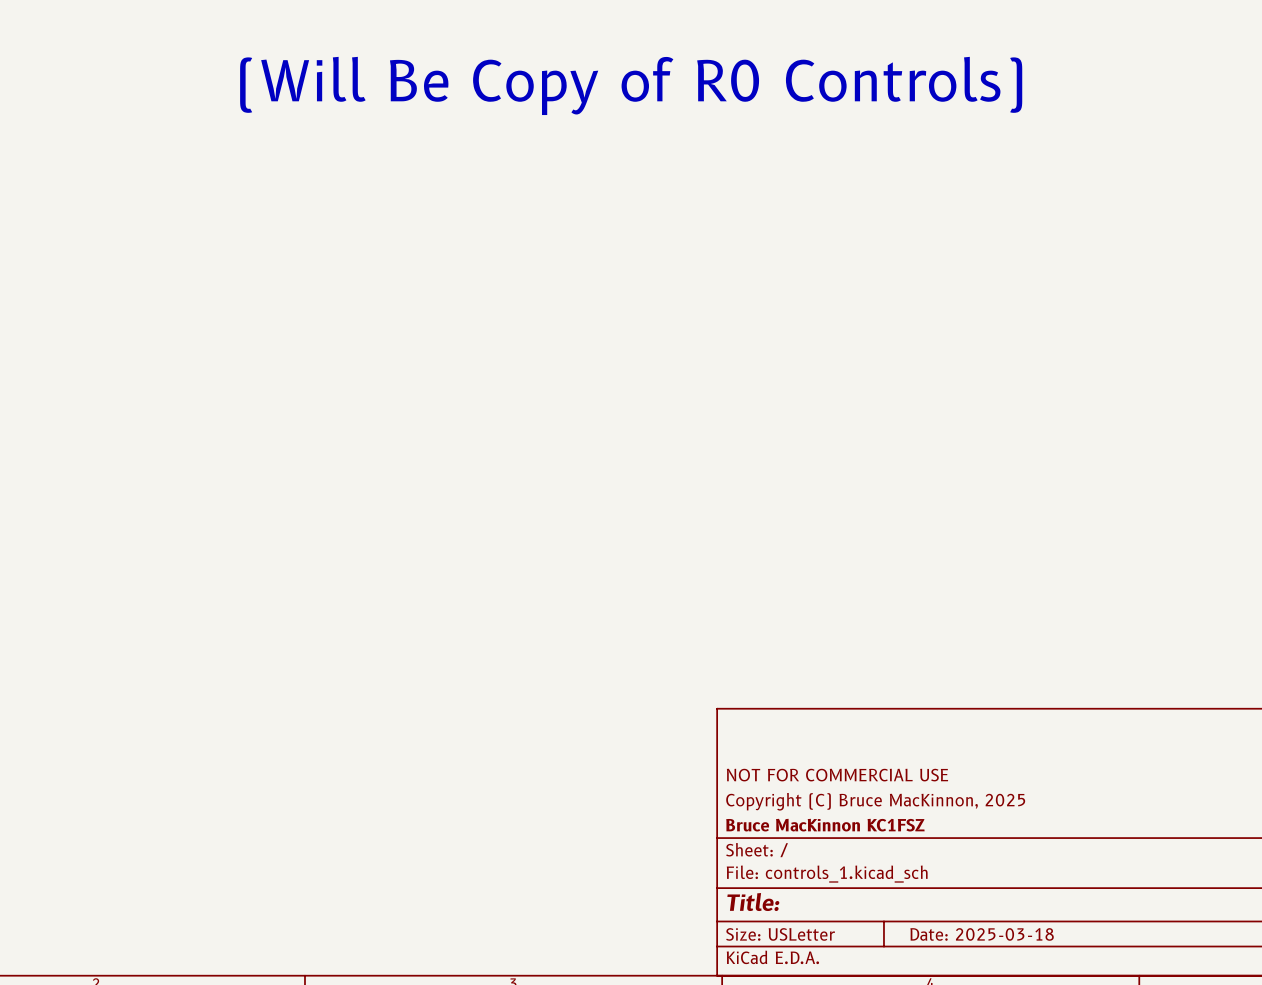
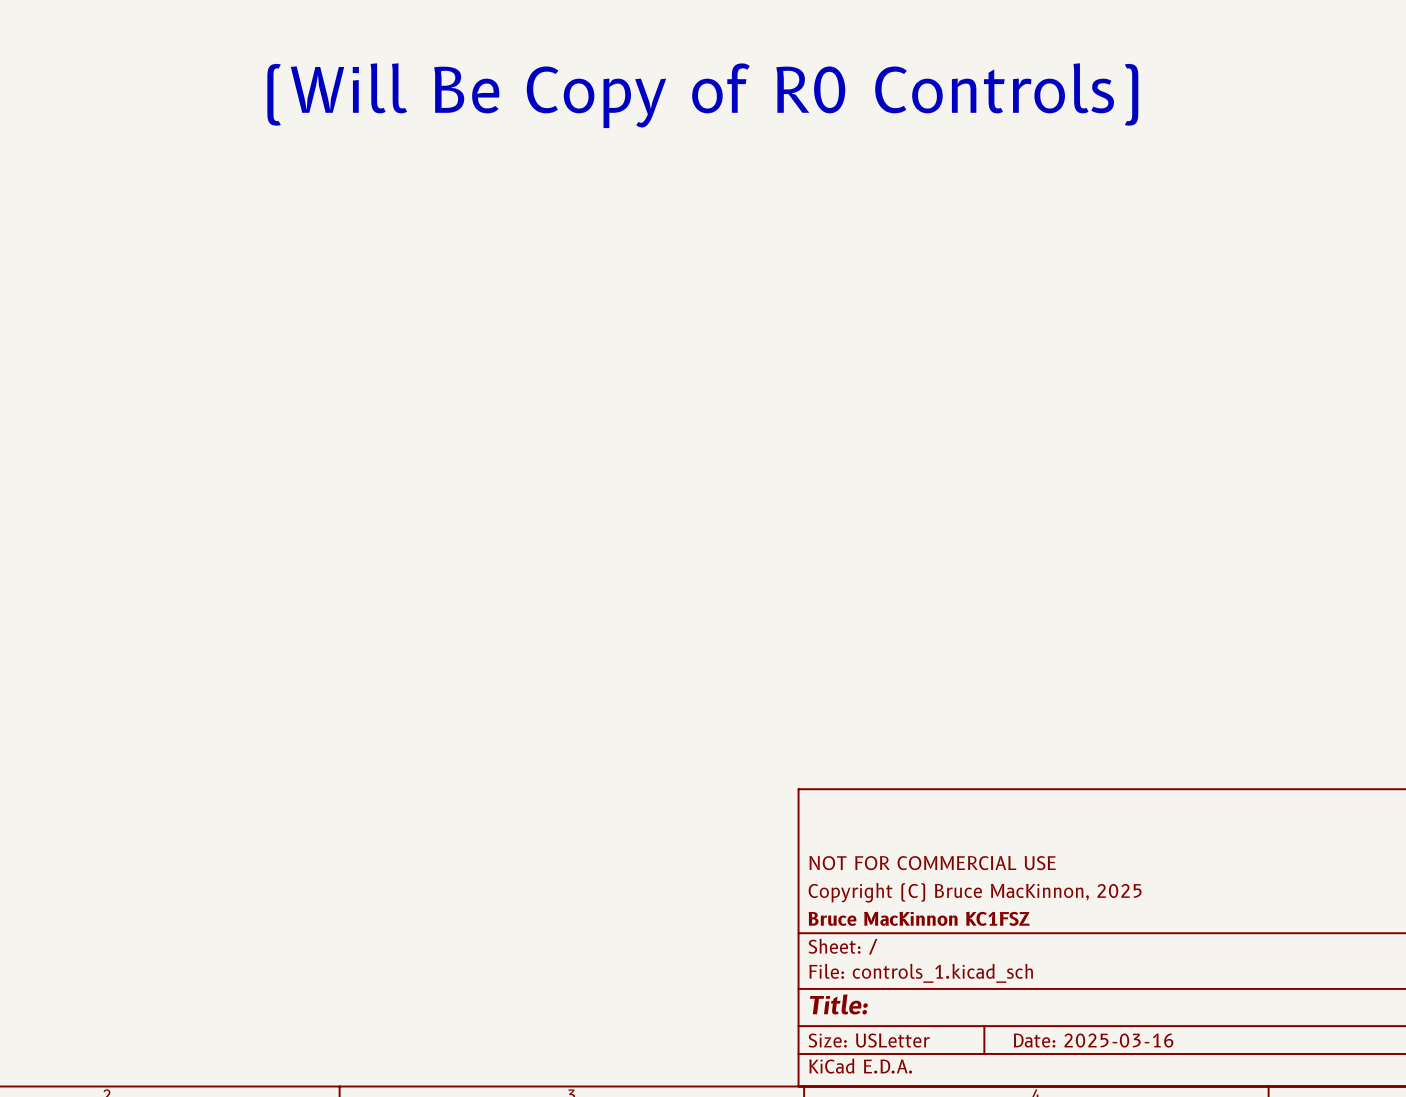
title block: Date: 2025-03-18 (982, 934) -> Date: 2025-03-16 (1093, 1040)

